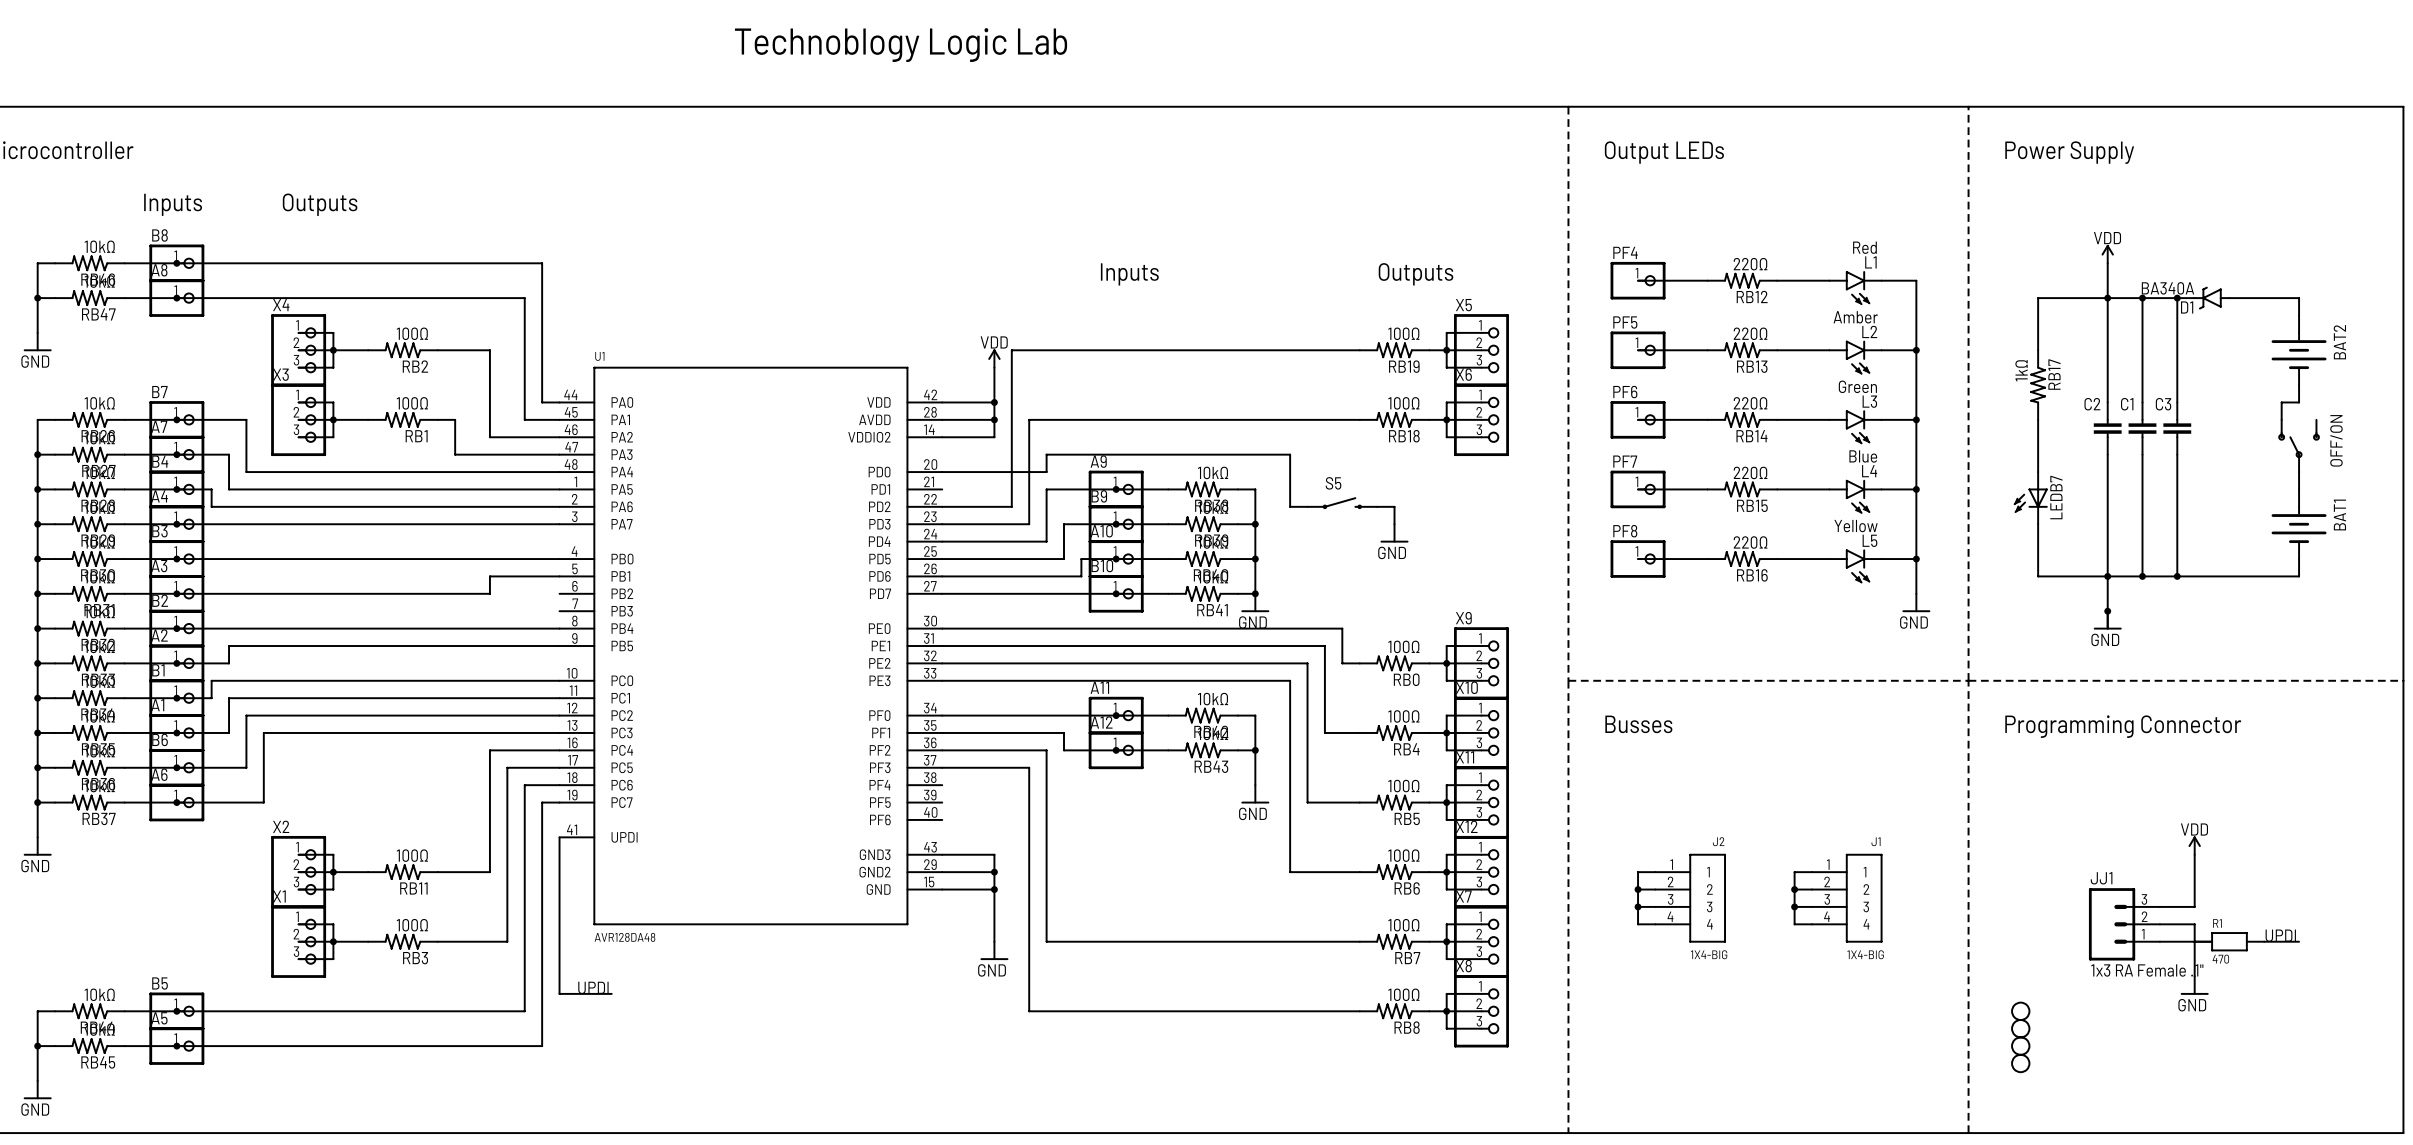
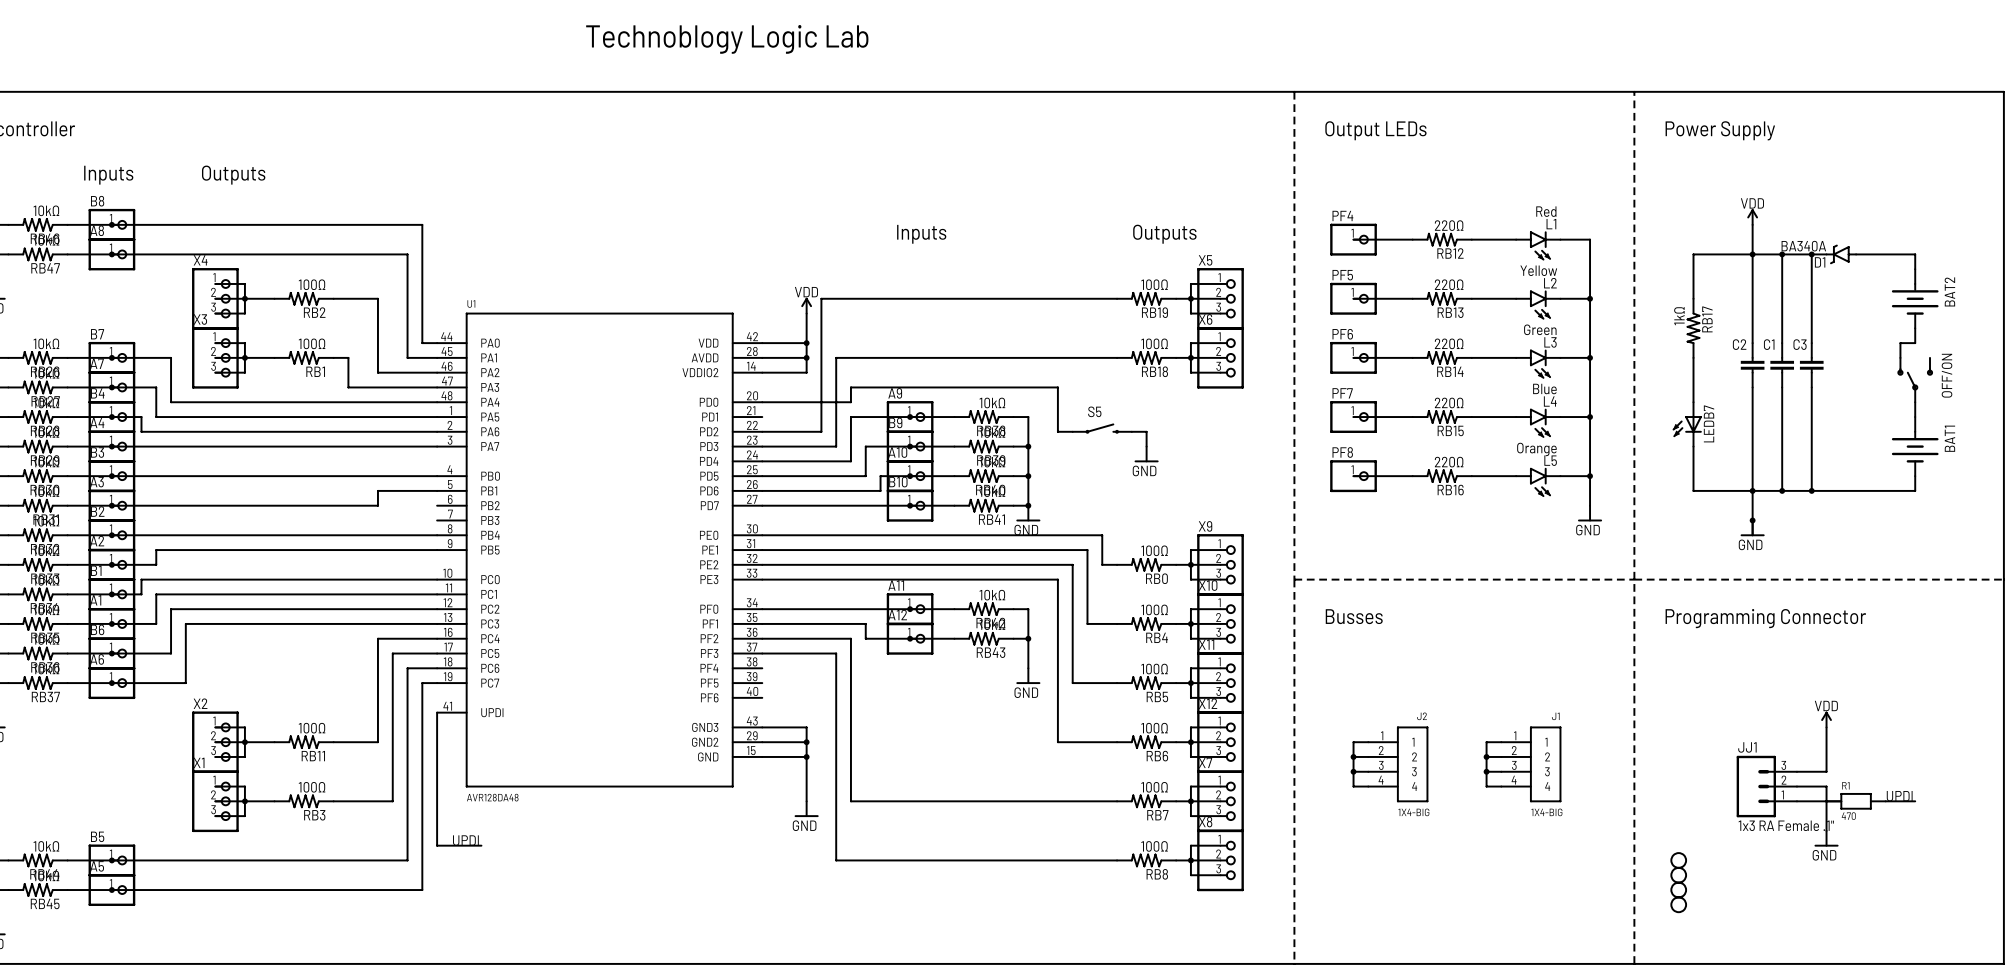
L2 value: Amber (1855, 317) -> Yellow (1538, 270)
L5 value: Yellow (1856, 526) -> Orange (1536, 449)

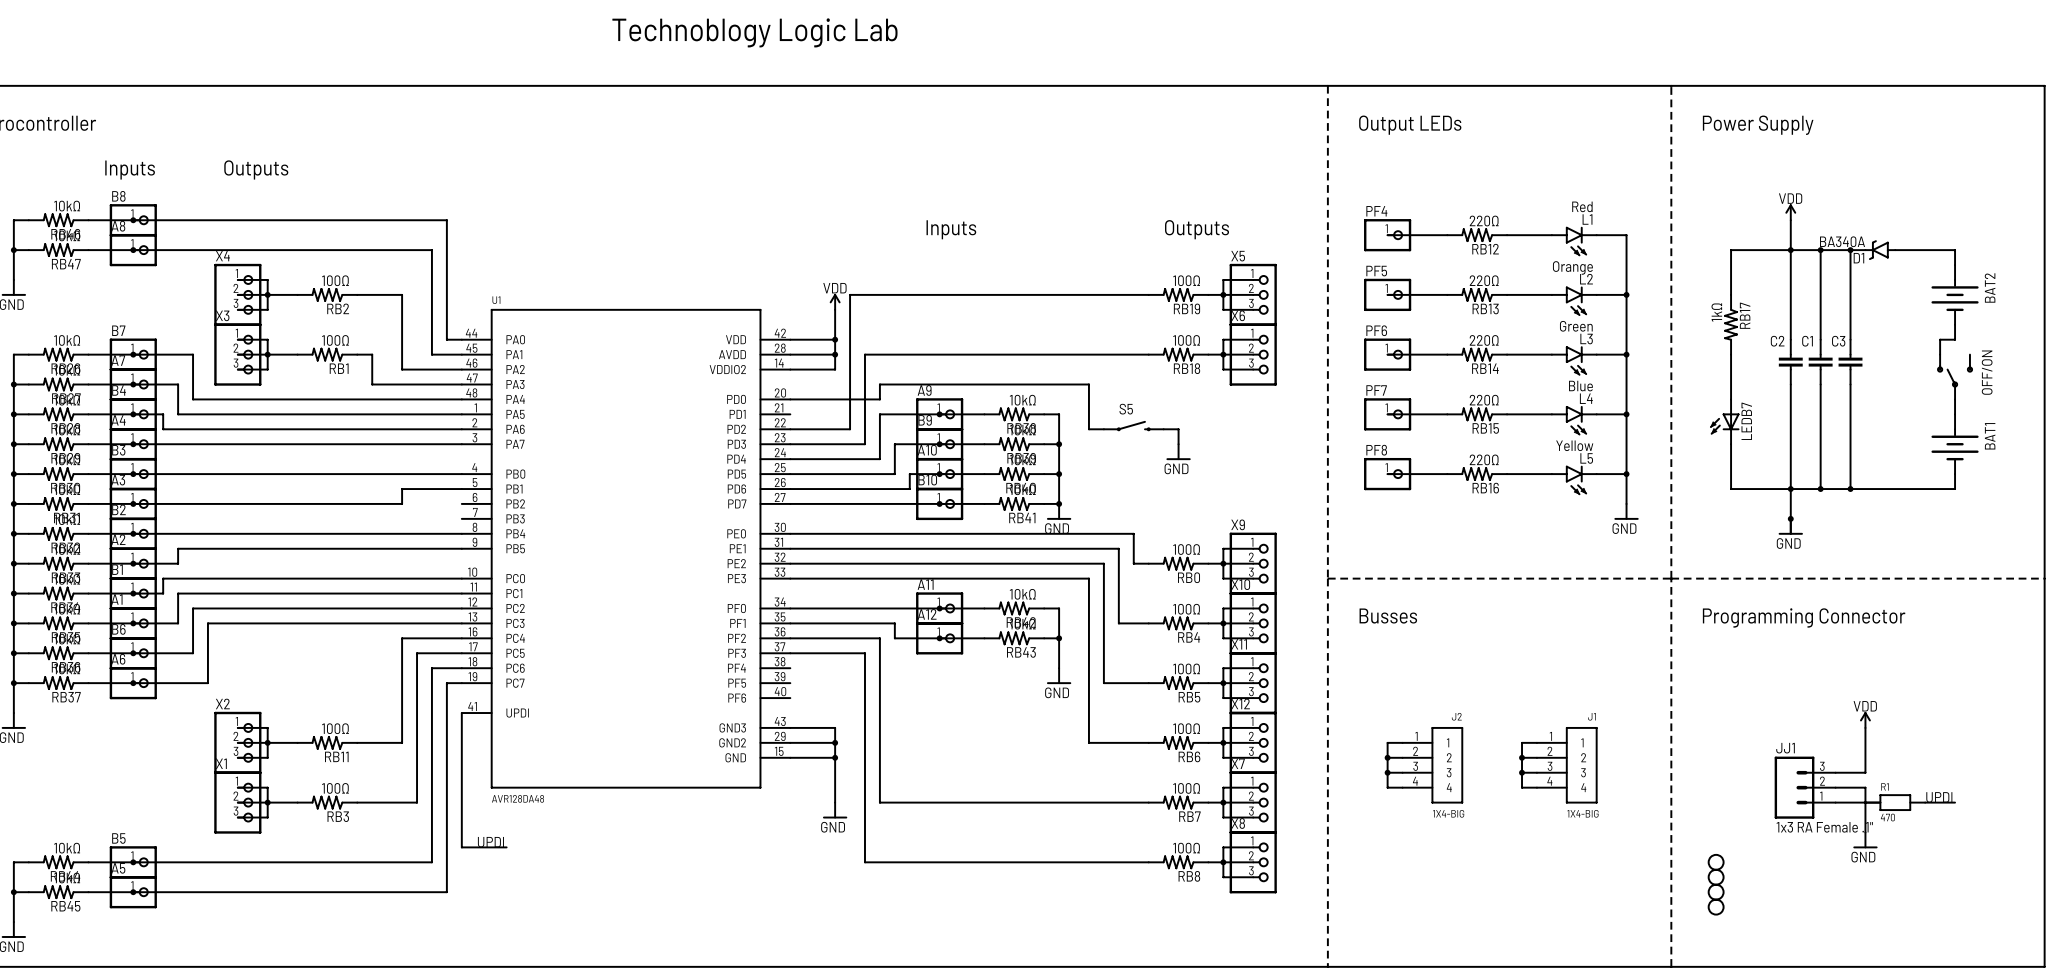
L2 value: Yellow (1538, 270) -> Orange (1572, 267)
L5 value: Orange (1536, 449) -> Yellow (1574, 445)

